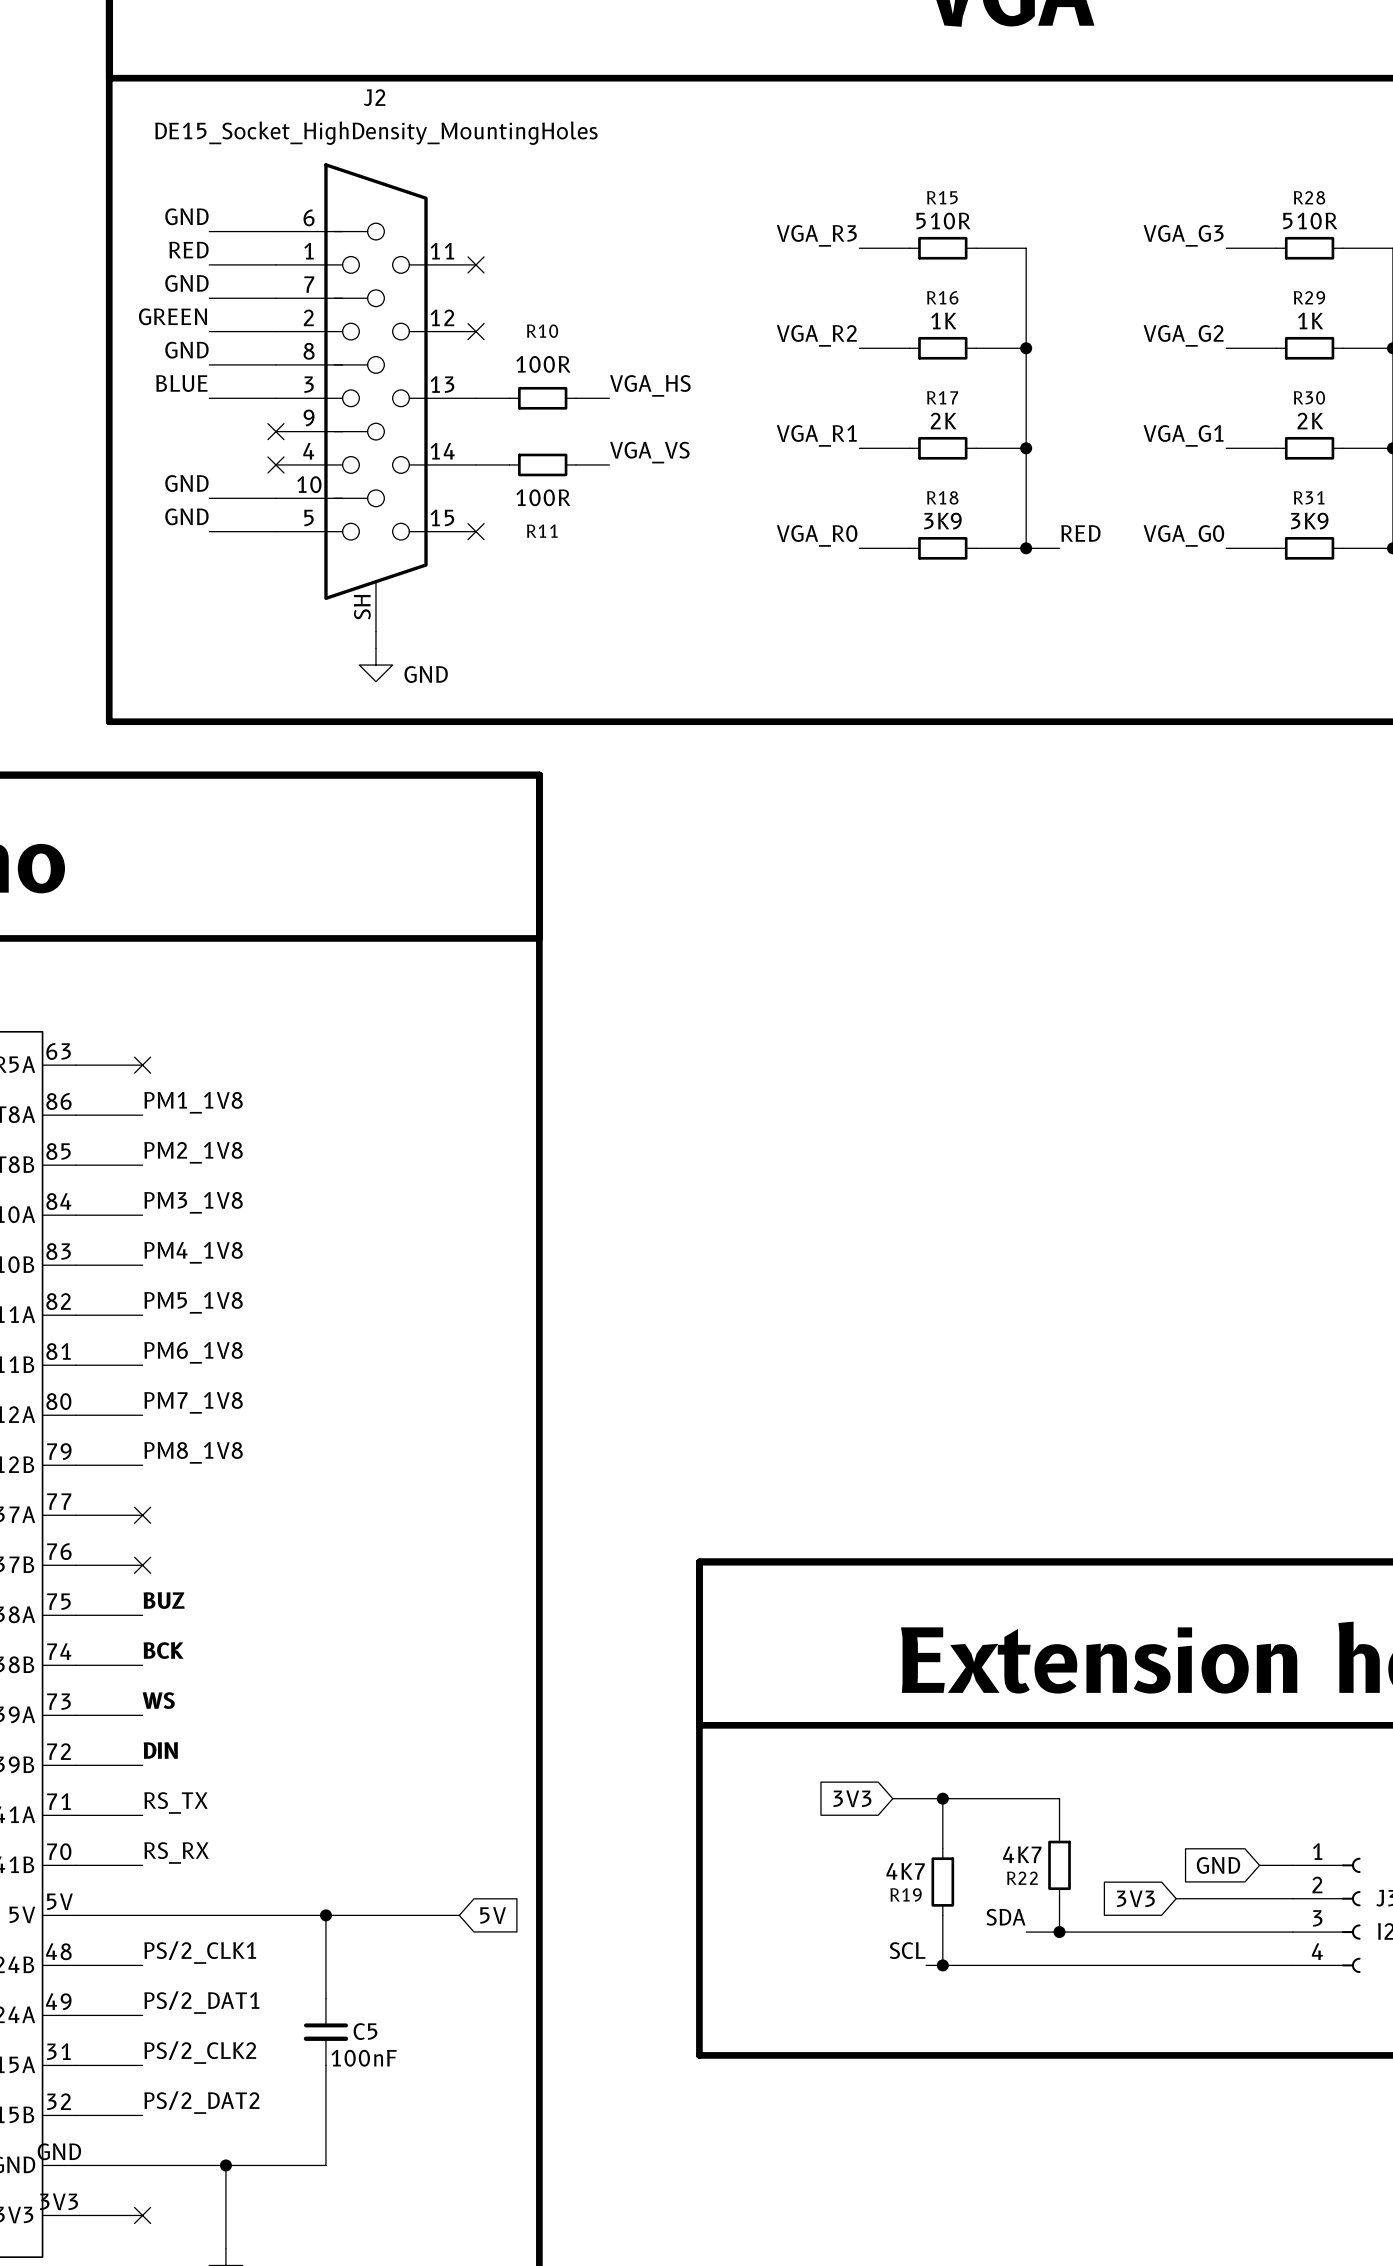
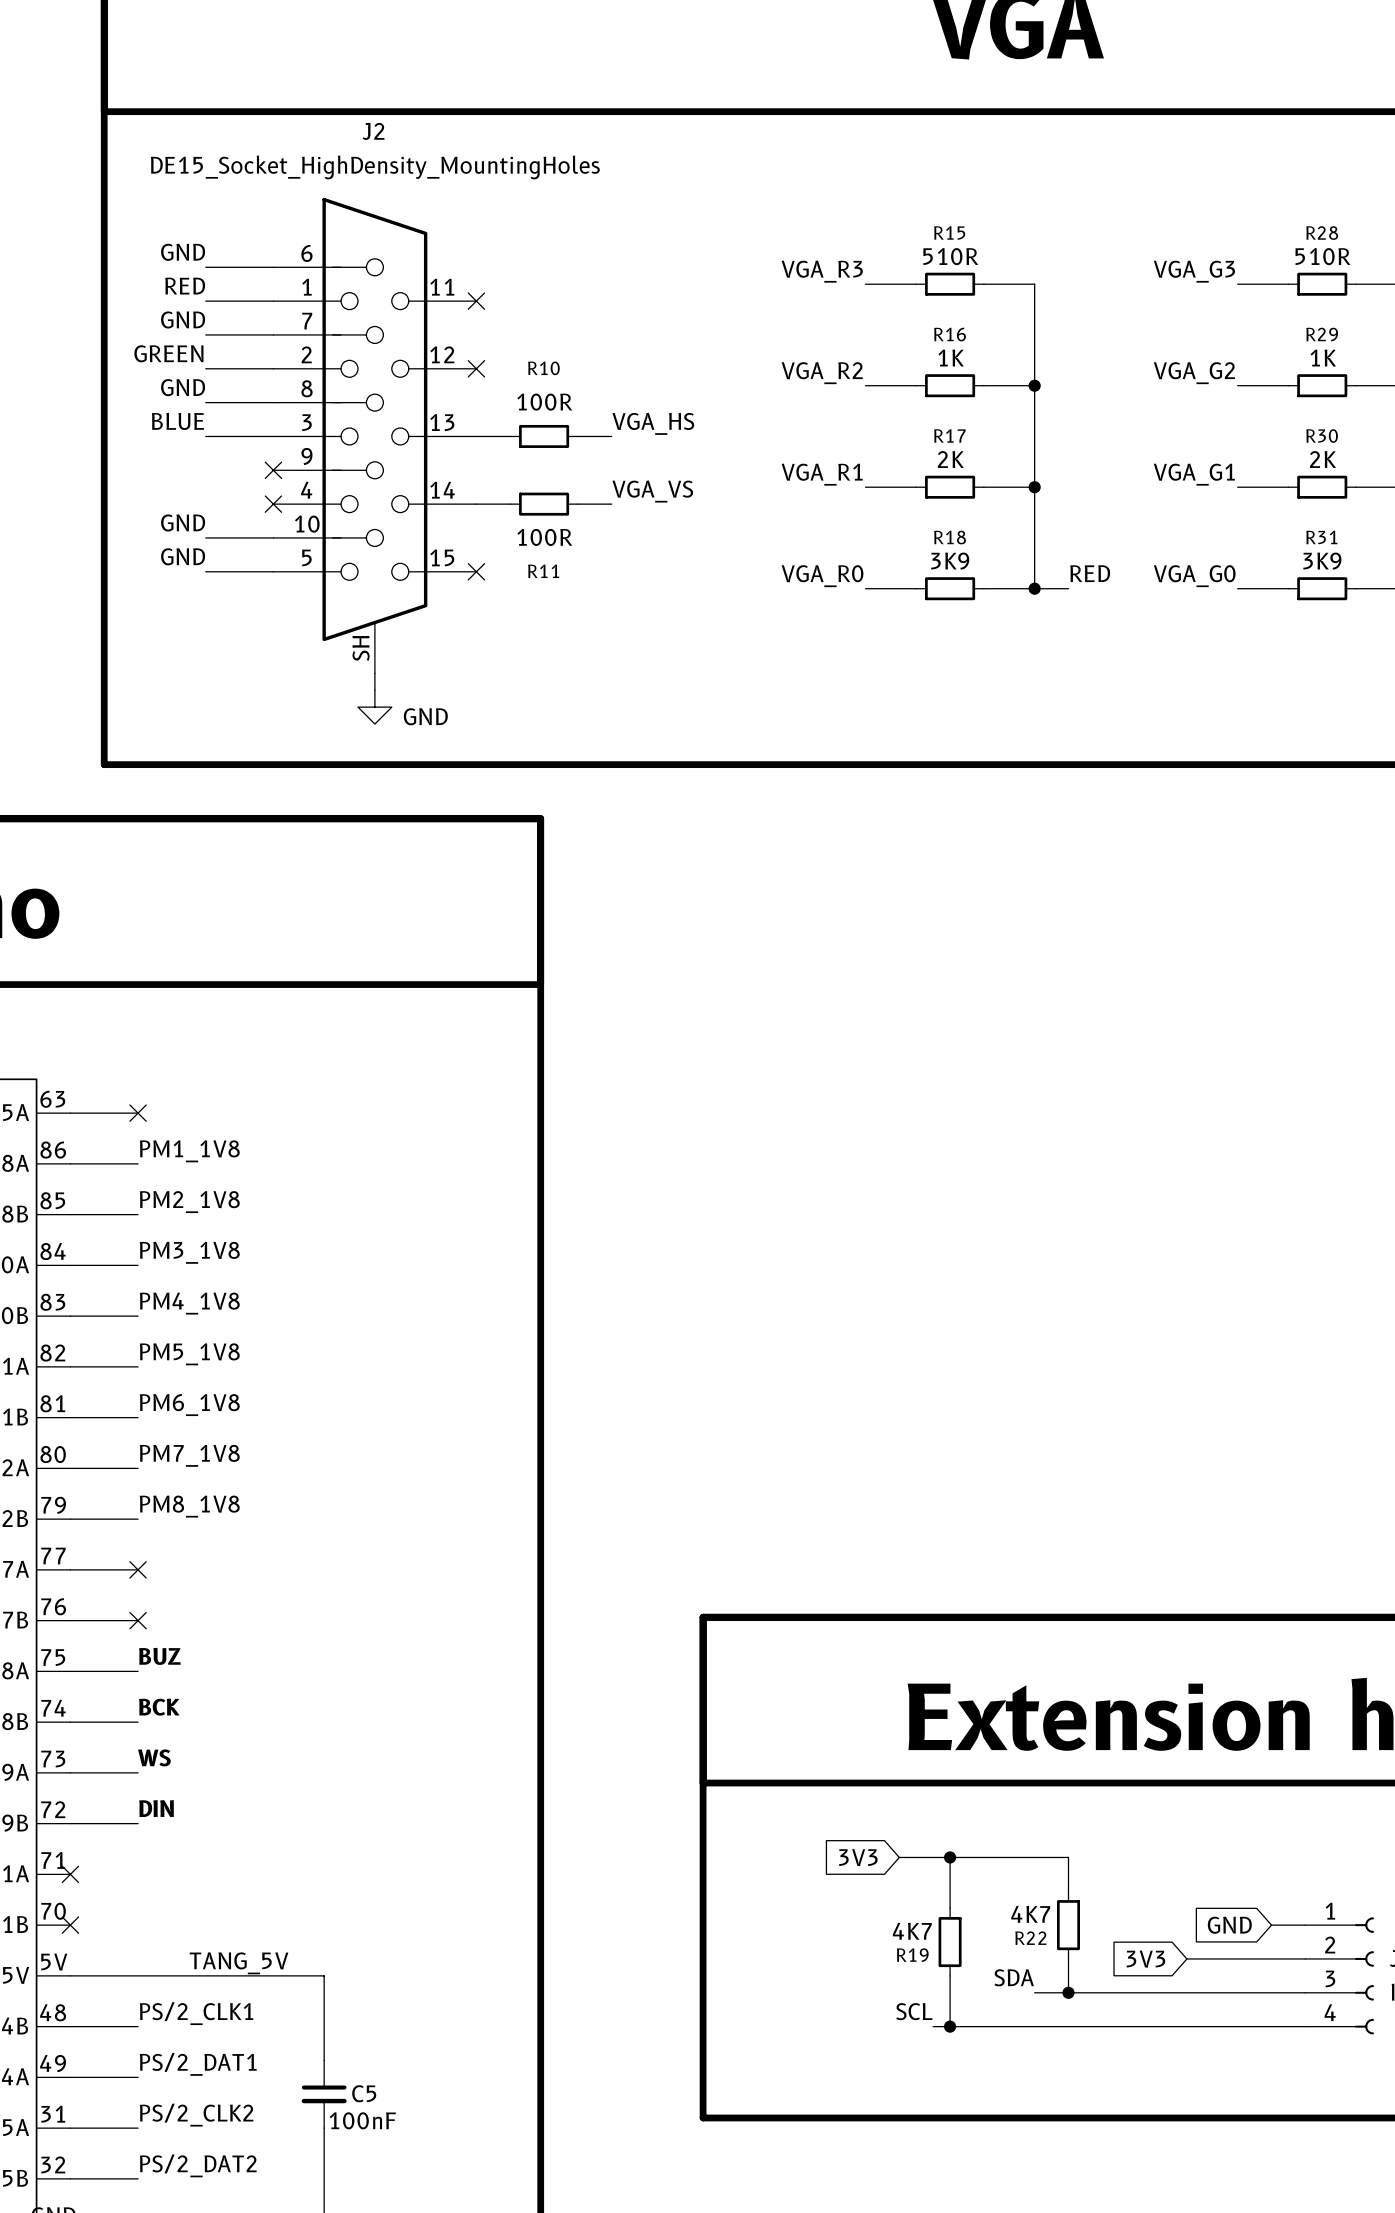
label: RS_TX (175, 1802) -> none
wire: (75, 1815) (142, 1815) -> none
no-connect mark: none -> (70, 1874)
label: RS_RX (176, 1852) -> none
wire: (75, 1865) (142, 1865) -> none
no-connect mark: none -> (70, 1925)
label: none -> TANG_5V (239, 1963)
wire: (325, 1915) (459, 1915) -> none
junction: (325, 1915) -> none
global label: 5V (493, 1915) -> none

